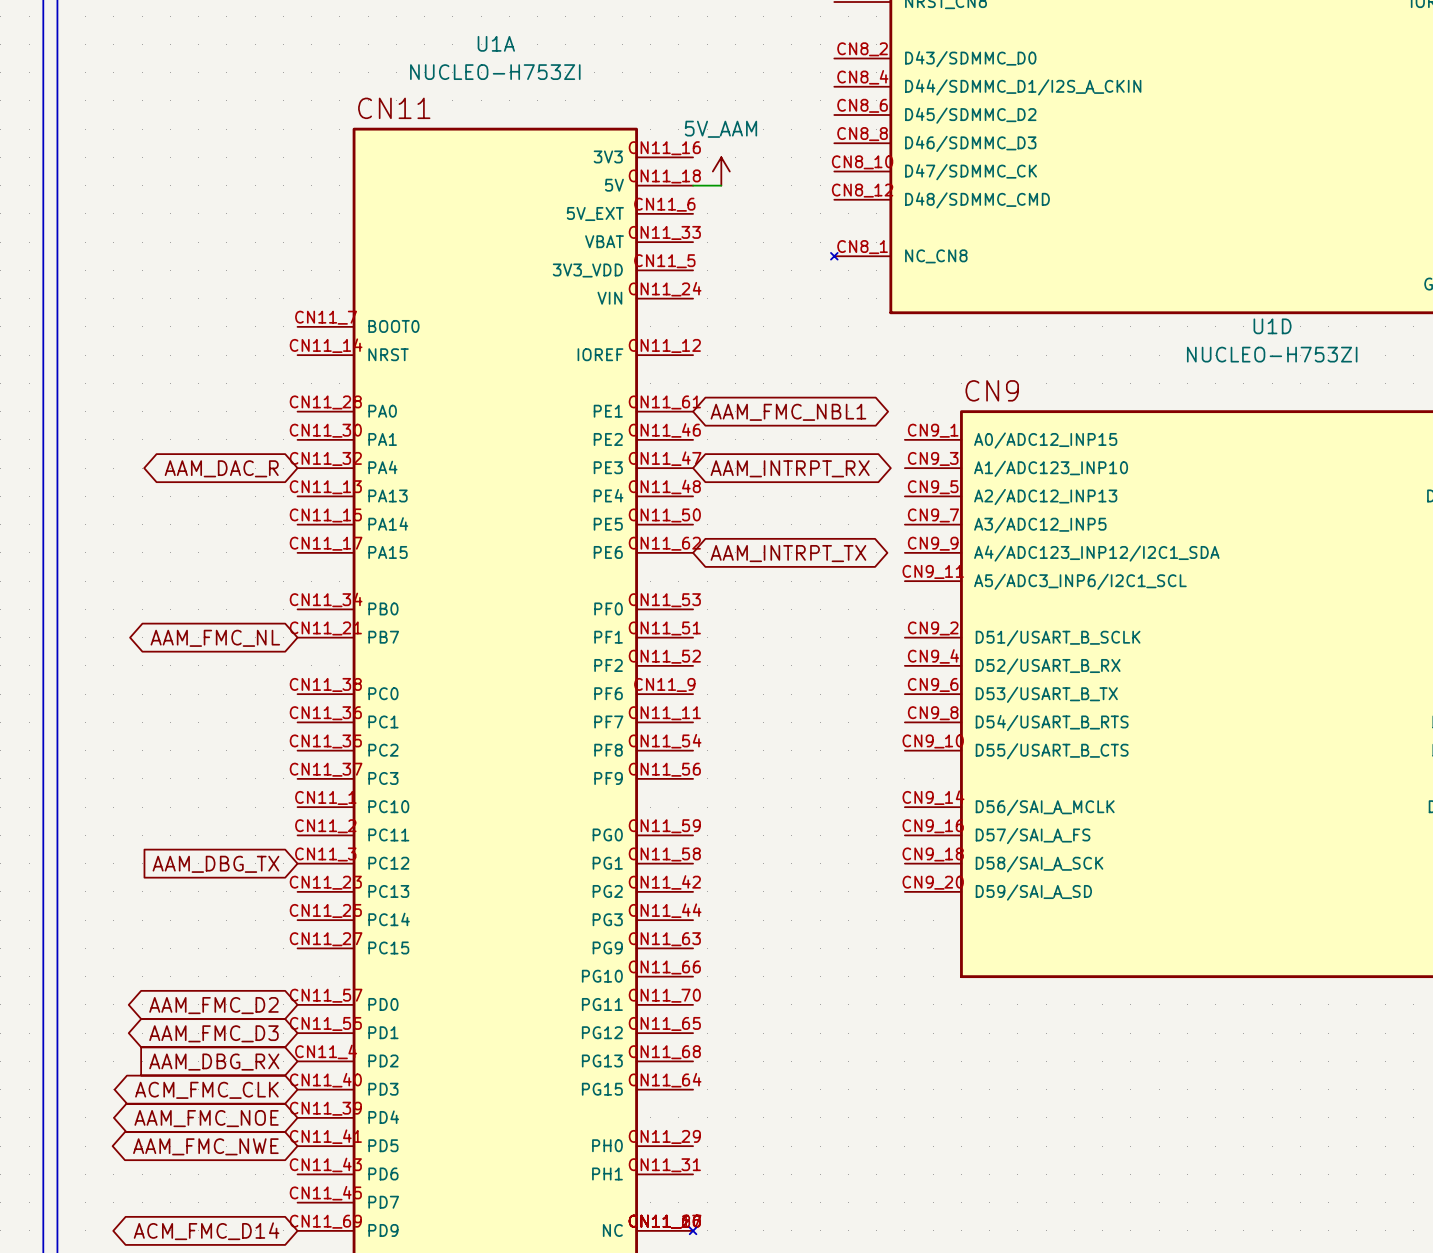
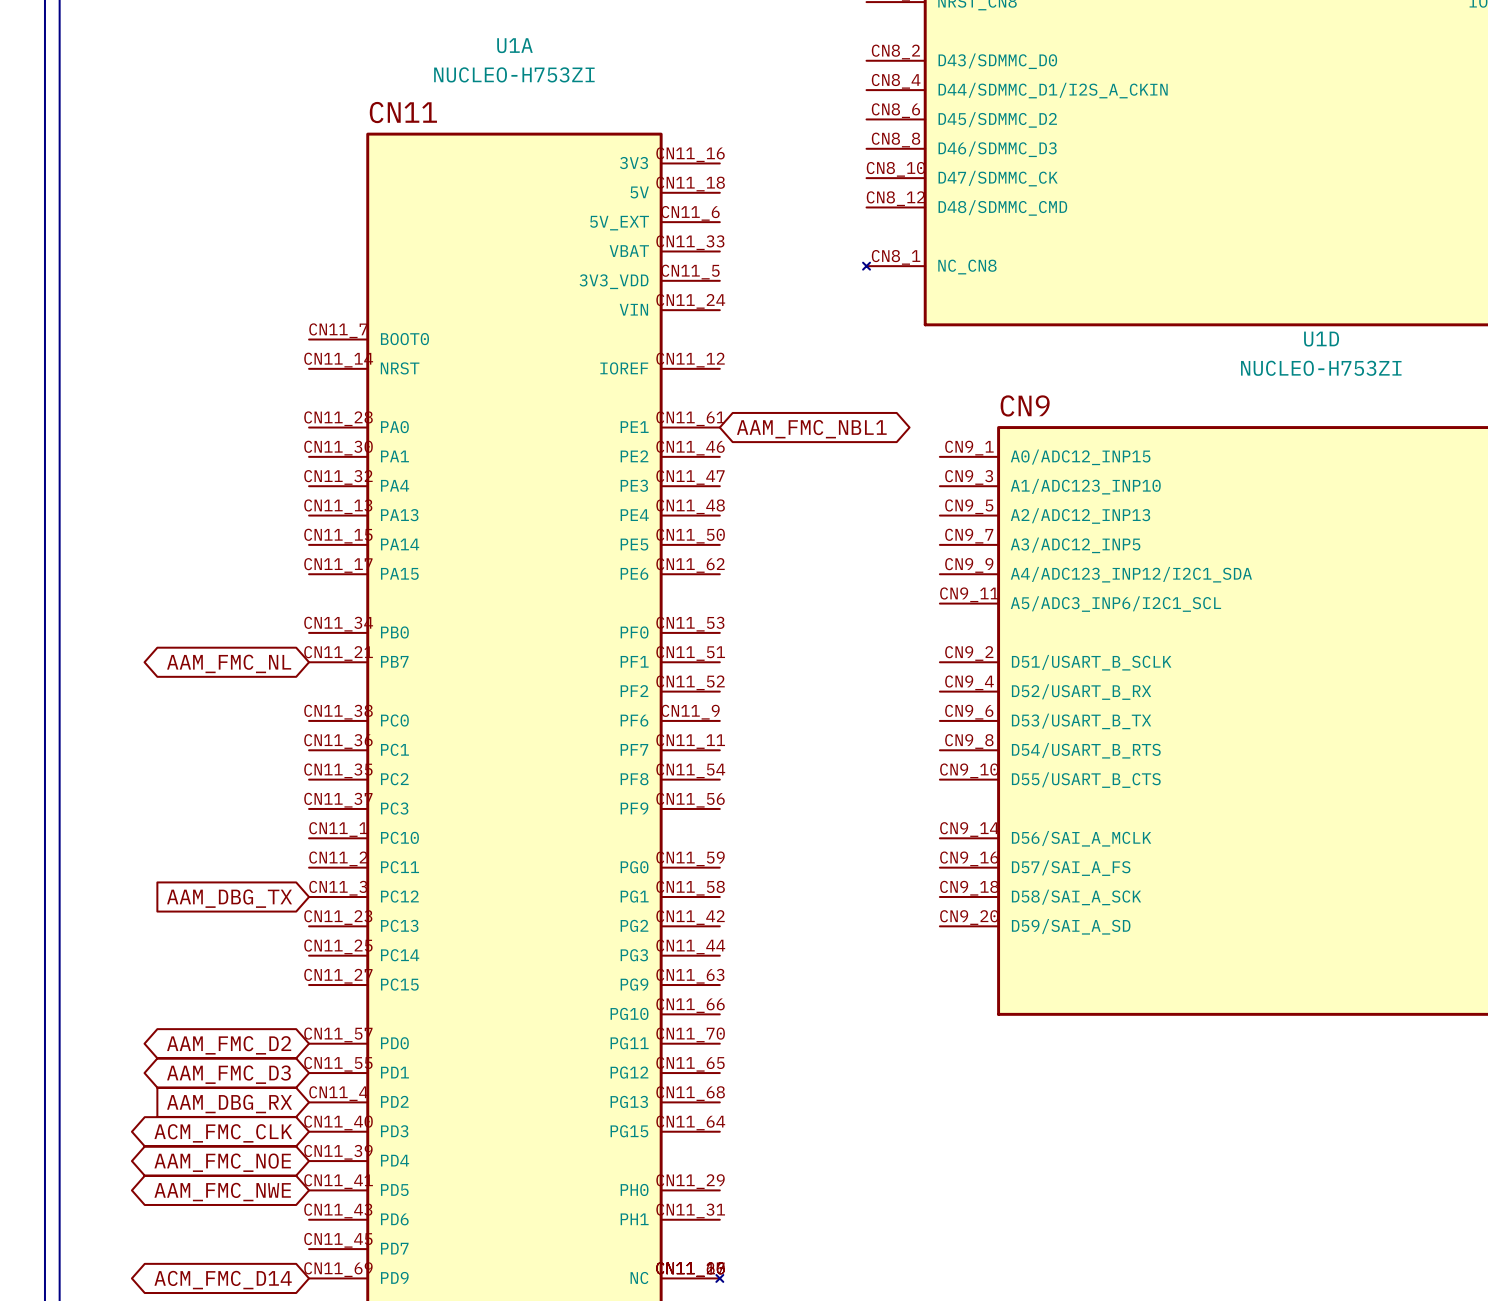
power symbol: 5V_AAM (721, 171) -> none
wire: (693, 185) (721, 185) -> none
global label: AAM_DAC_R (221, 468) -> none
global label: AAM_INTRPT_RX (790, 468) -> none
global label: AAM_INTRPT_TX (788, 553) -> none

